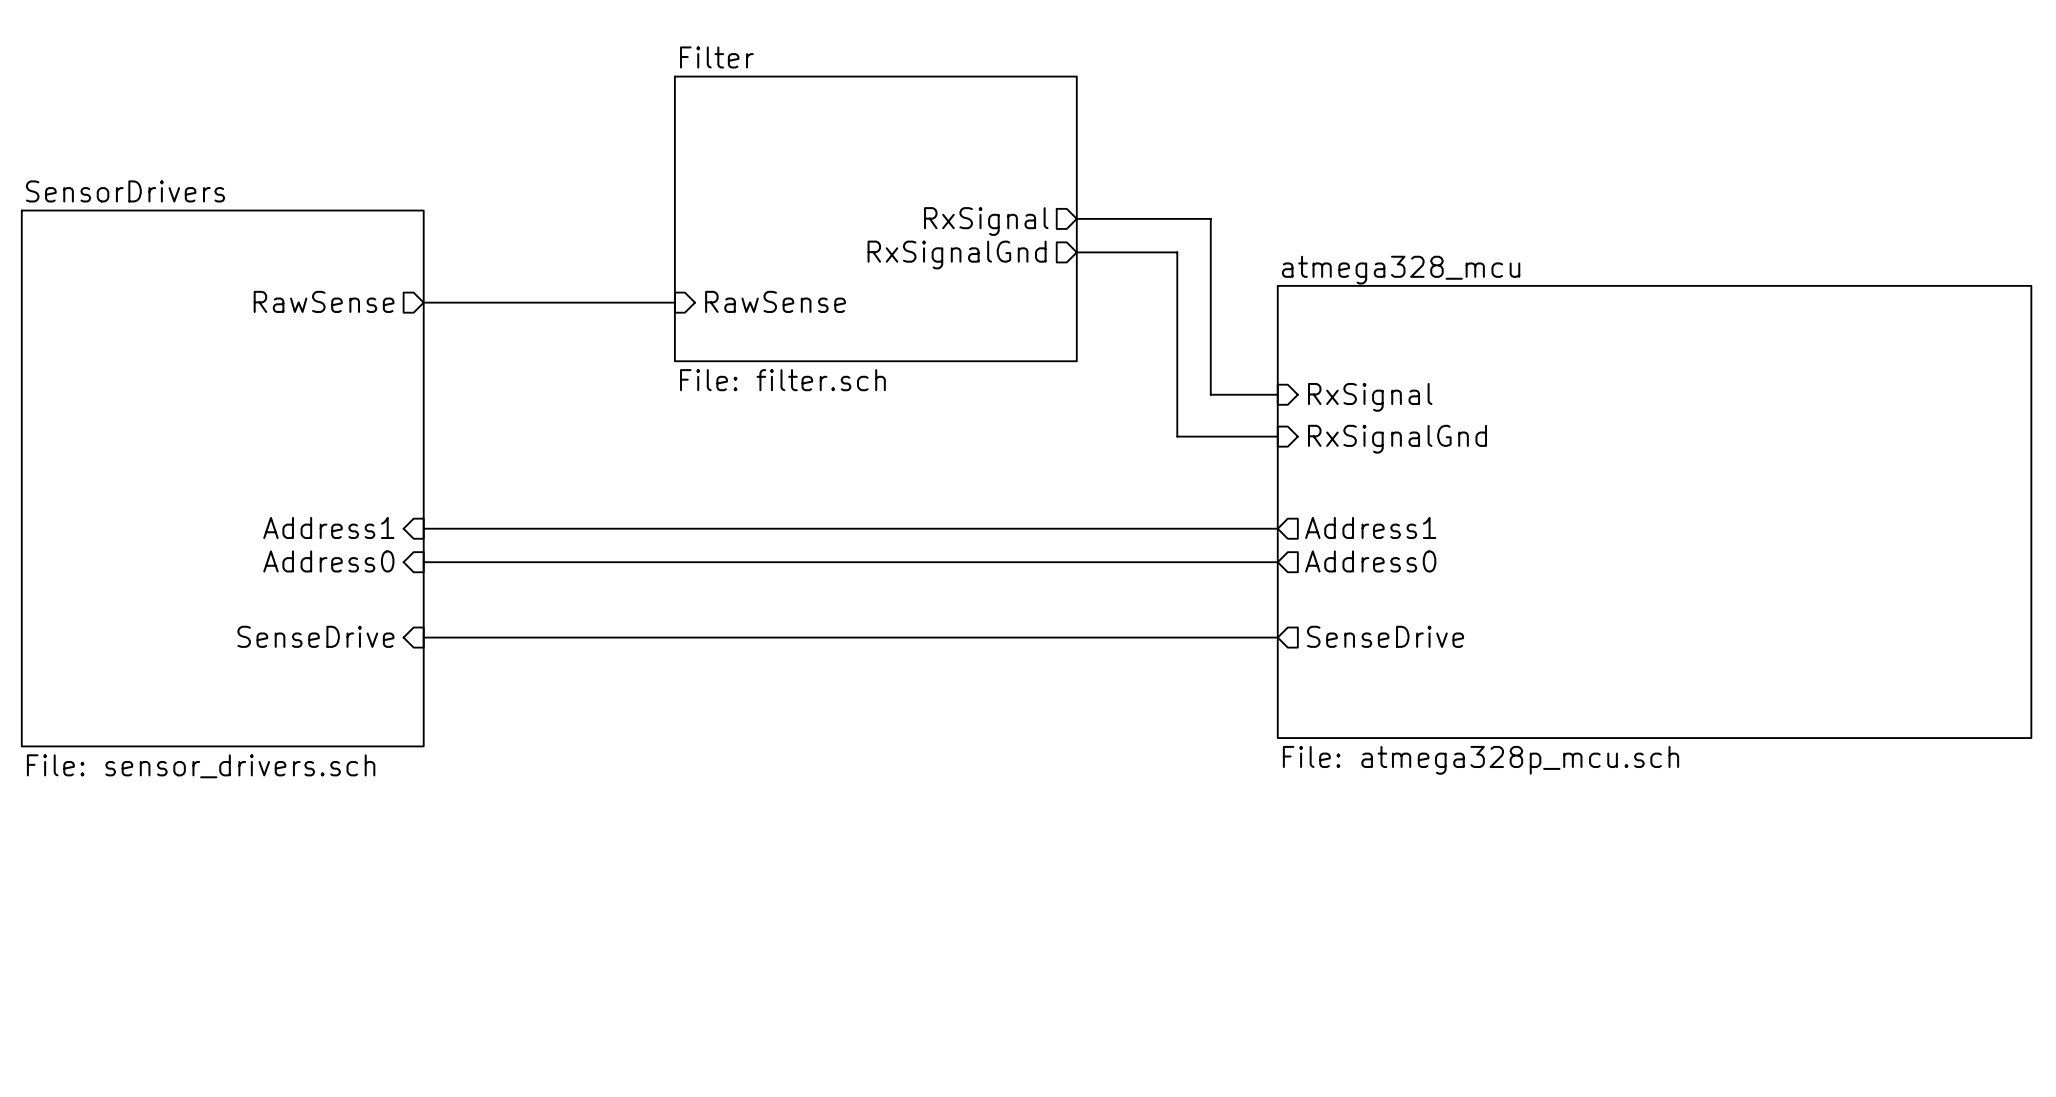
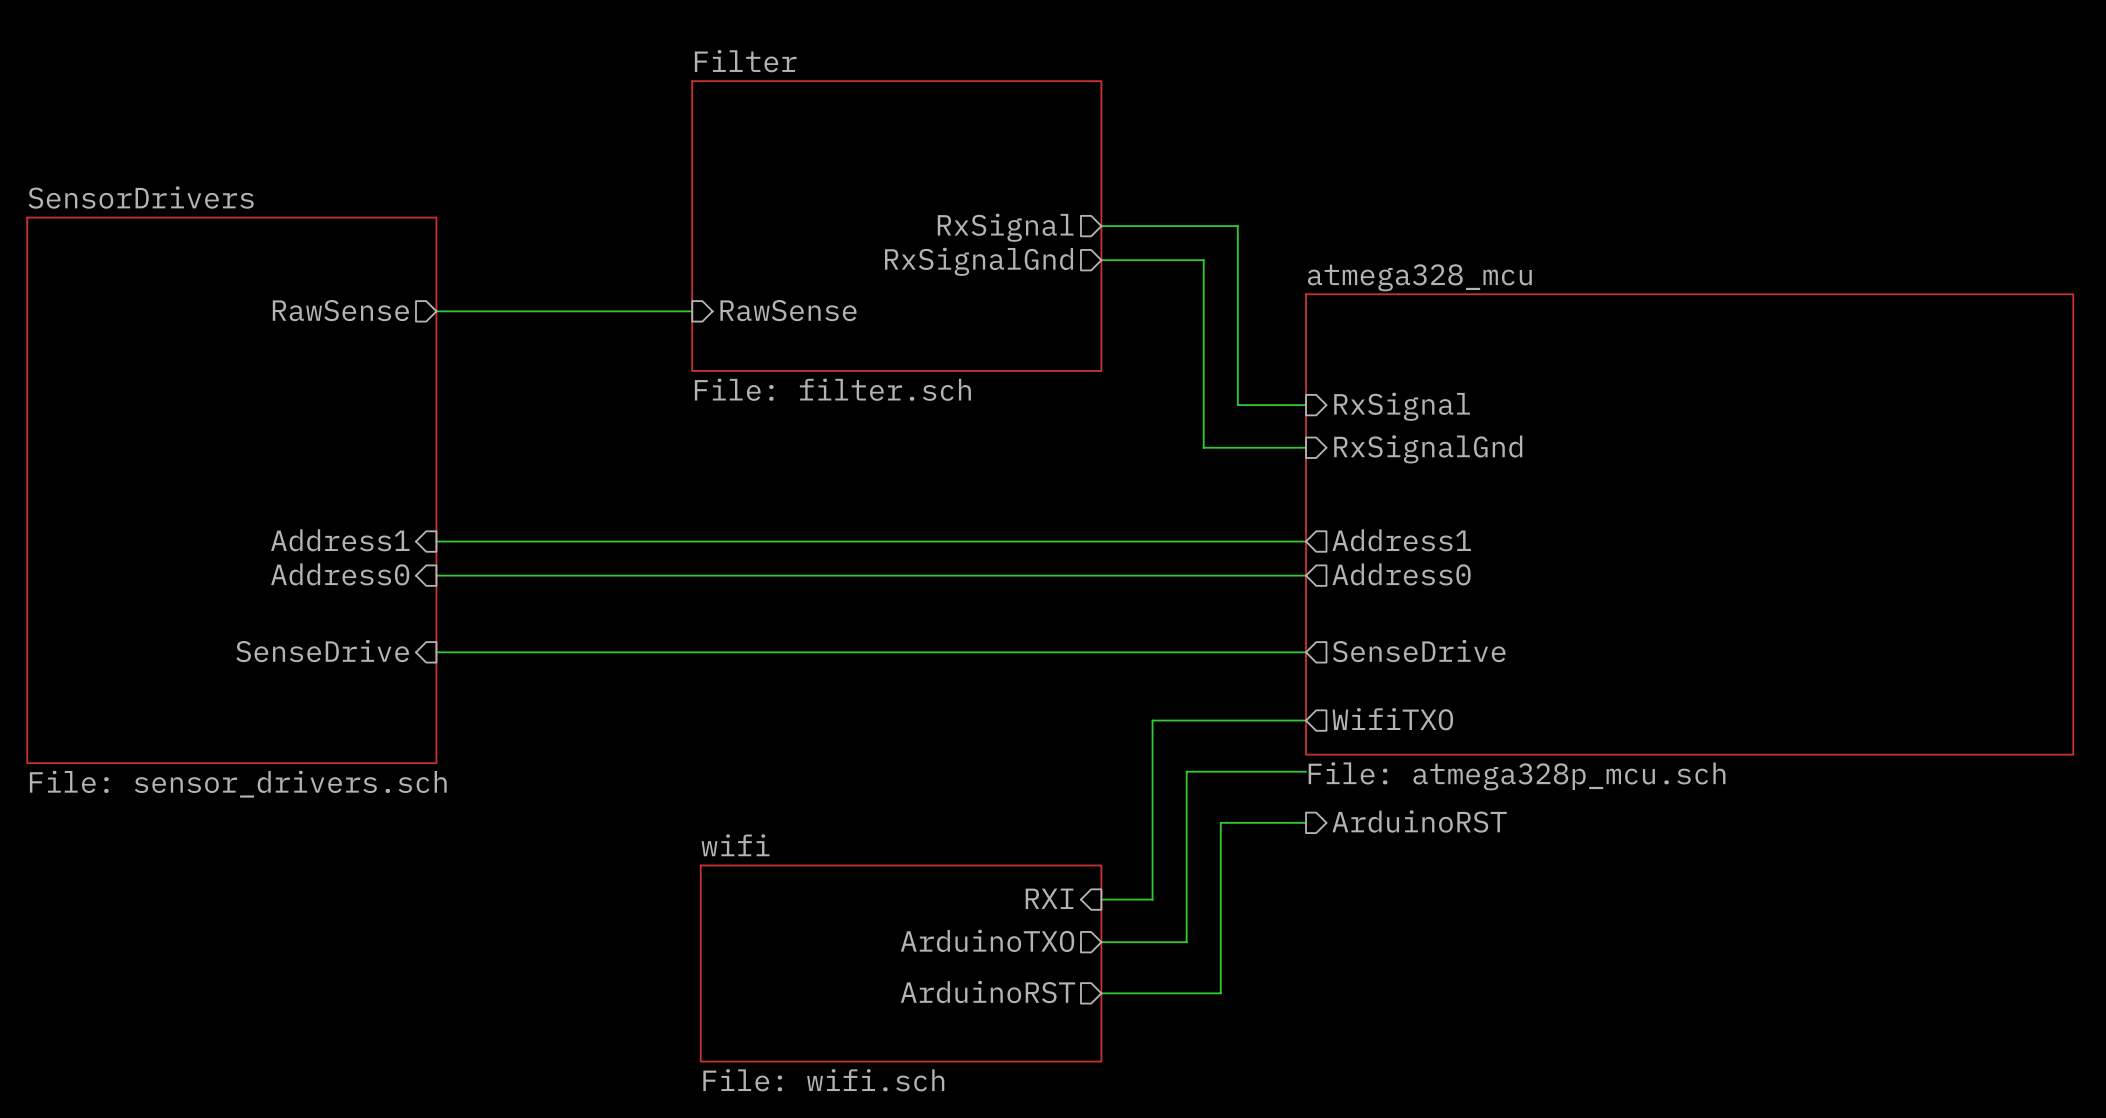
sheet pin: none -> WifiTXO (1392, 719)
wire: none -> (1306, 720) (1152, 720) (1152, 899) (1101, 899)
wire: none -> (1306, 771) (1186, 771) (1186, 942) (1101, 942)
sheet pin: none -> ArduinoRST (1419, 821)
wire: none -> (1306, 822) (1220, 822) (1220, 993) (1101, 993)
sheet pin: none -> RXI (1049, 898)
sheet pin: none -> ArduinoTXO (987, 940)
sheet wifi: none -> File: wifi.sch (901, 963)
sheet pin: none -> ArduinoRST (987, 992)

